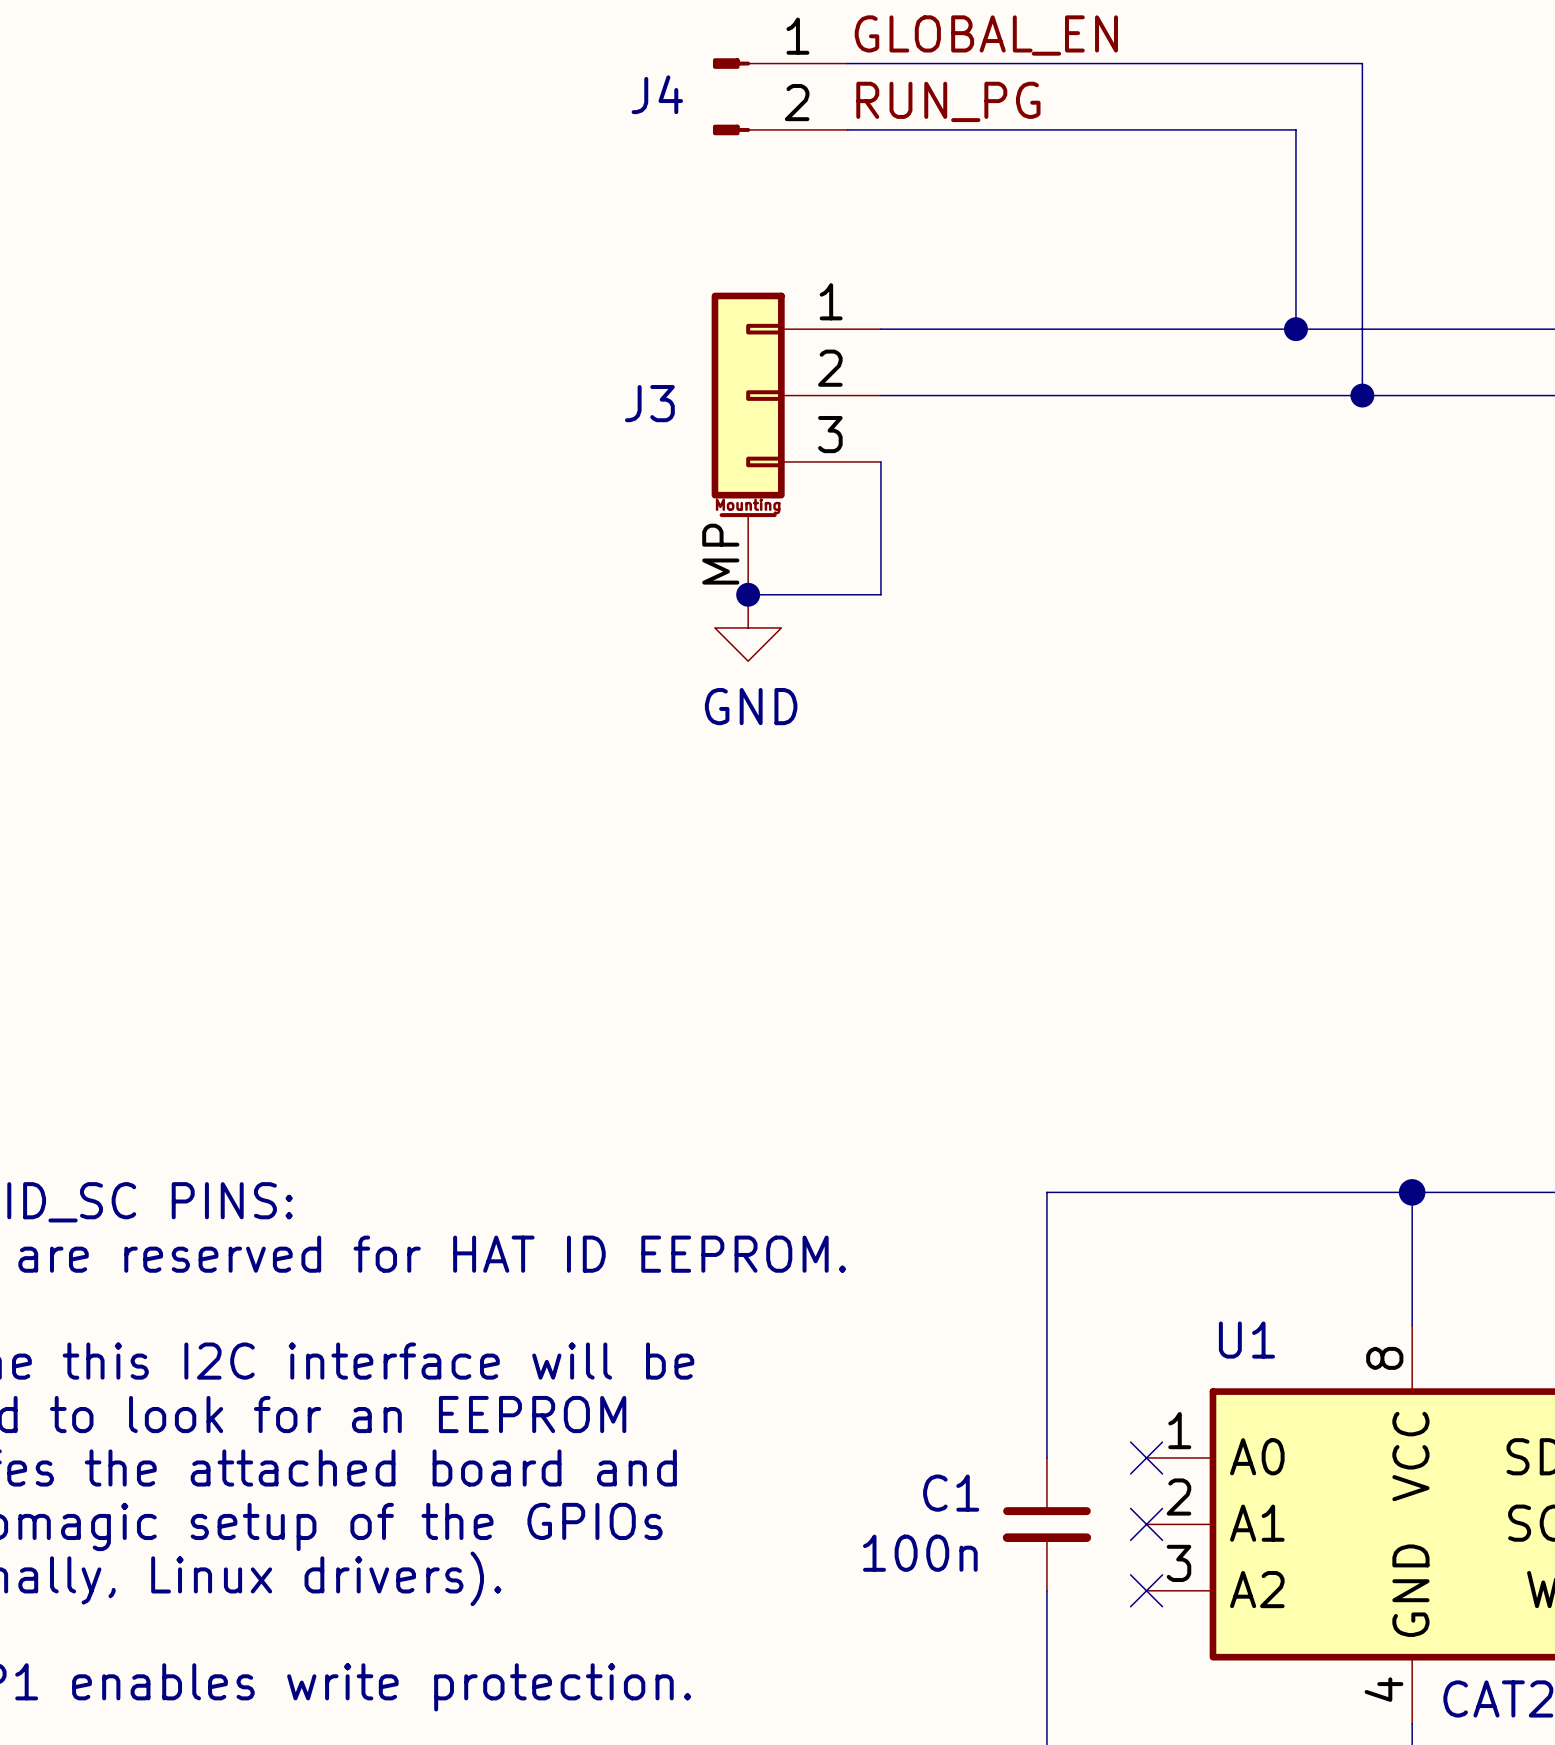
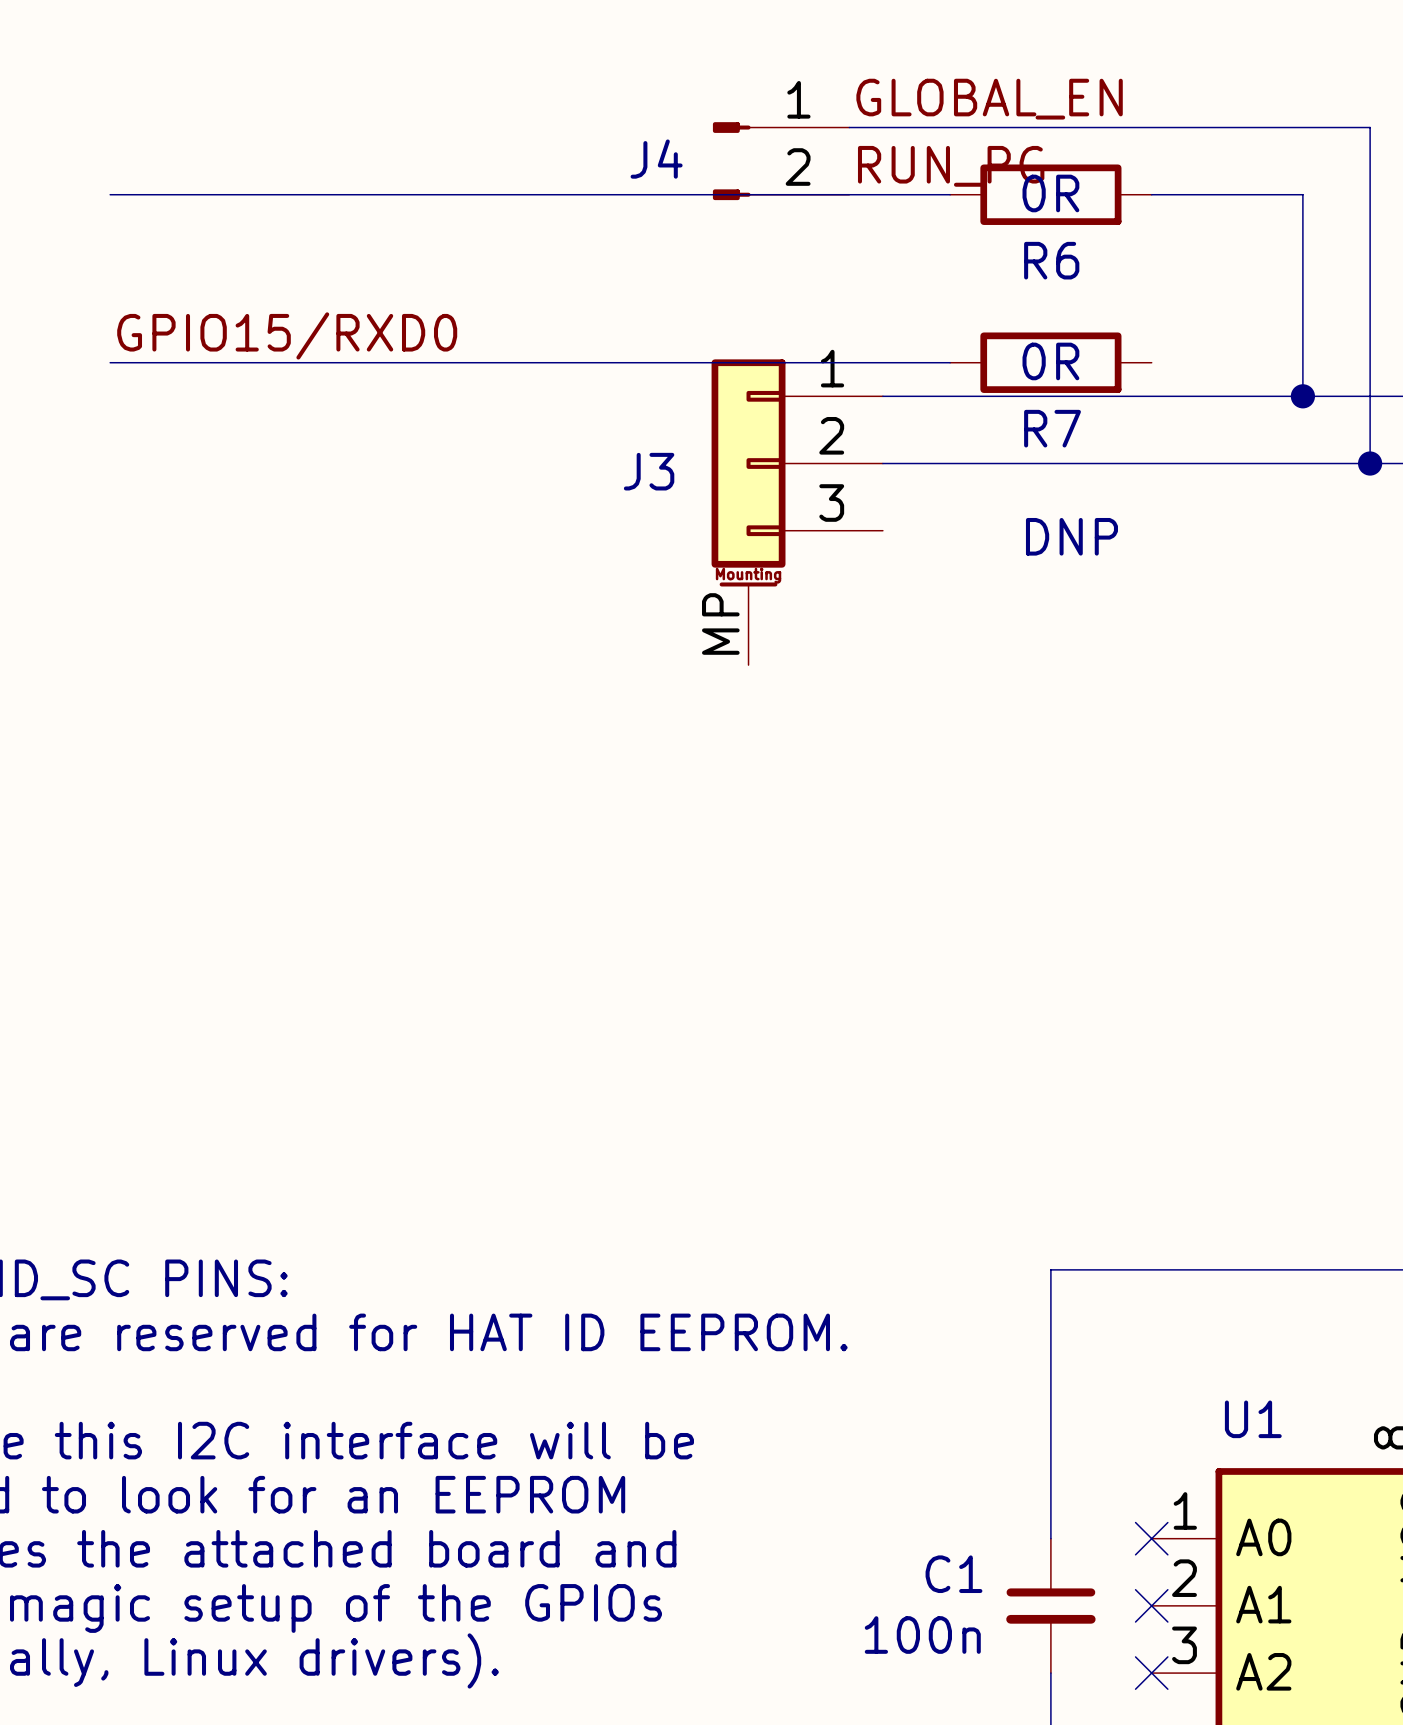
wire: none -> (110, 194) (849, 194)
wire: (947, 129) (1146, 129) -> none
R6: none -> 0R (1050, 194)
label: none -> GPIO15/RXD0 (287, 335)
wire: none -> (110, 362) (950, 362)
R7: none -> 0R (1050, 362)
wire: (880, 461) (880, 594) (748, 594) -> none
text: none -> DNP (1071, 536)
junction: (748, 594) -> none
power symbol: GND (748, 627) -> none

